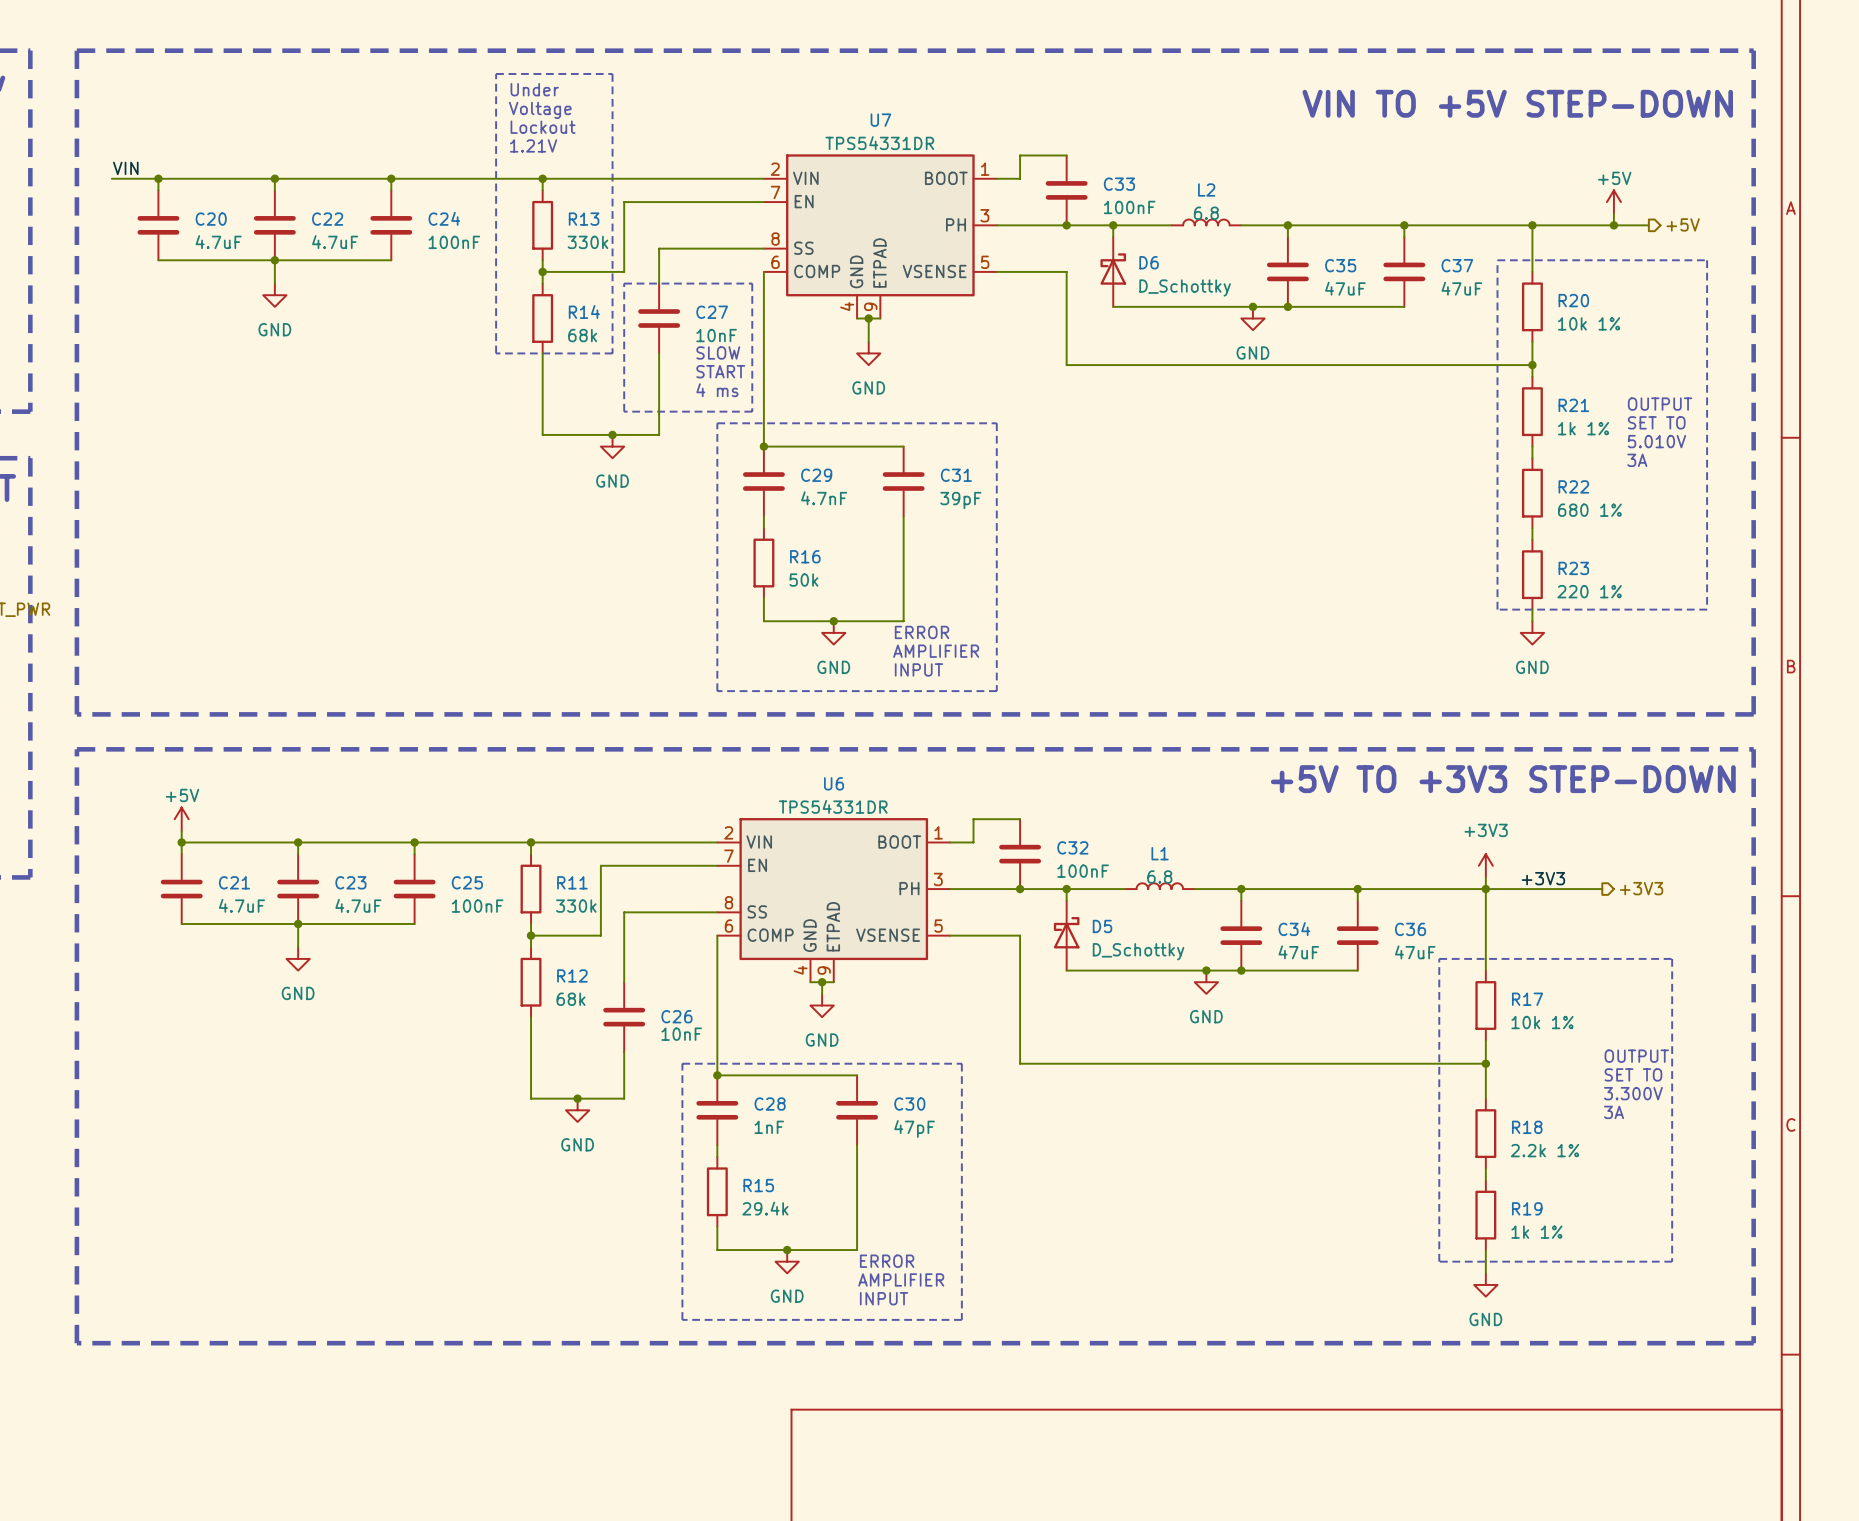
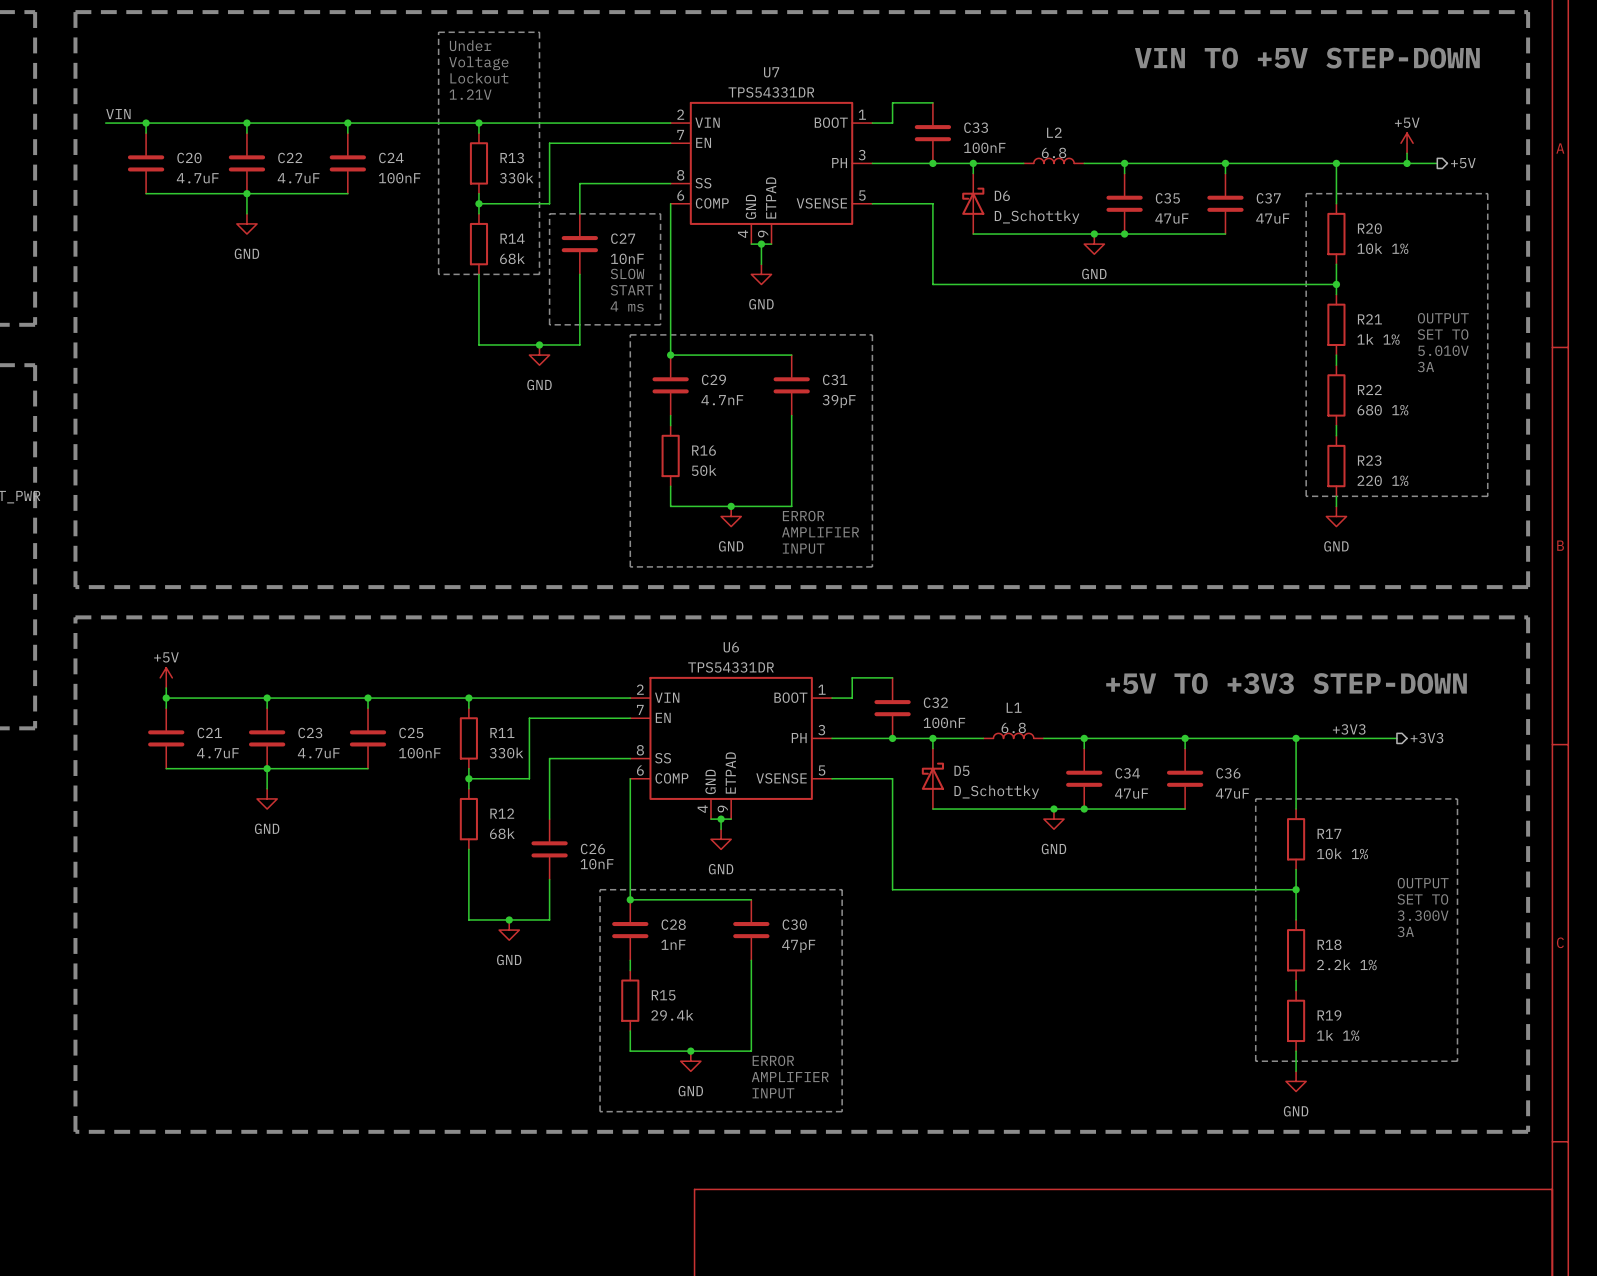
text position: +5V TO +3V3 STEP-DOWN (1503, 779) -> +5V TO +3V3 STEP-DOWN (1286, 683)
power symbol: +3V3 (1485, 865) -> none
wire: (1485, 877) (1485, 889) -> none

